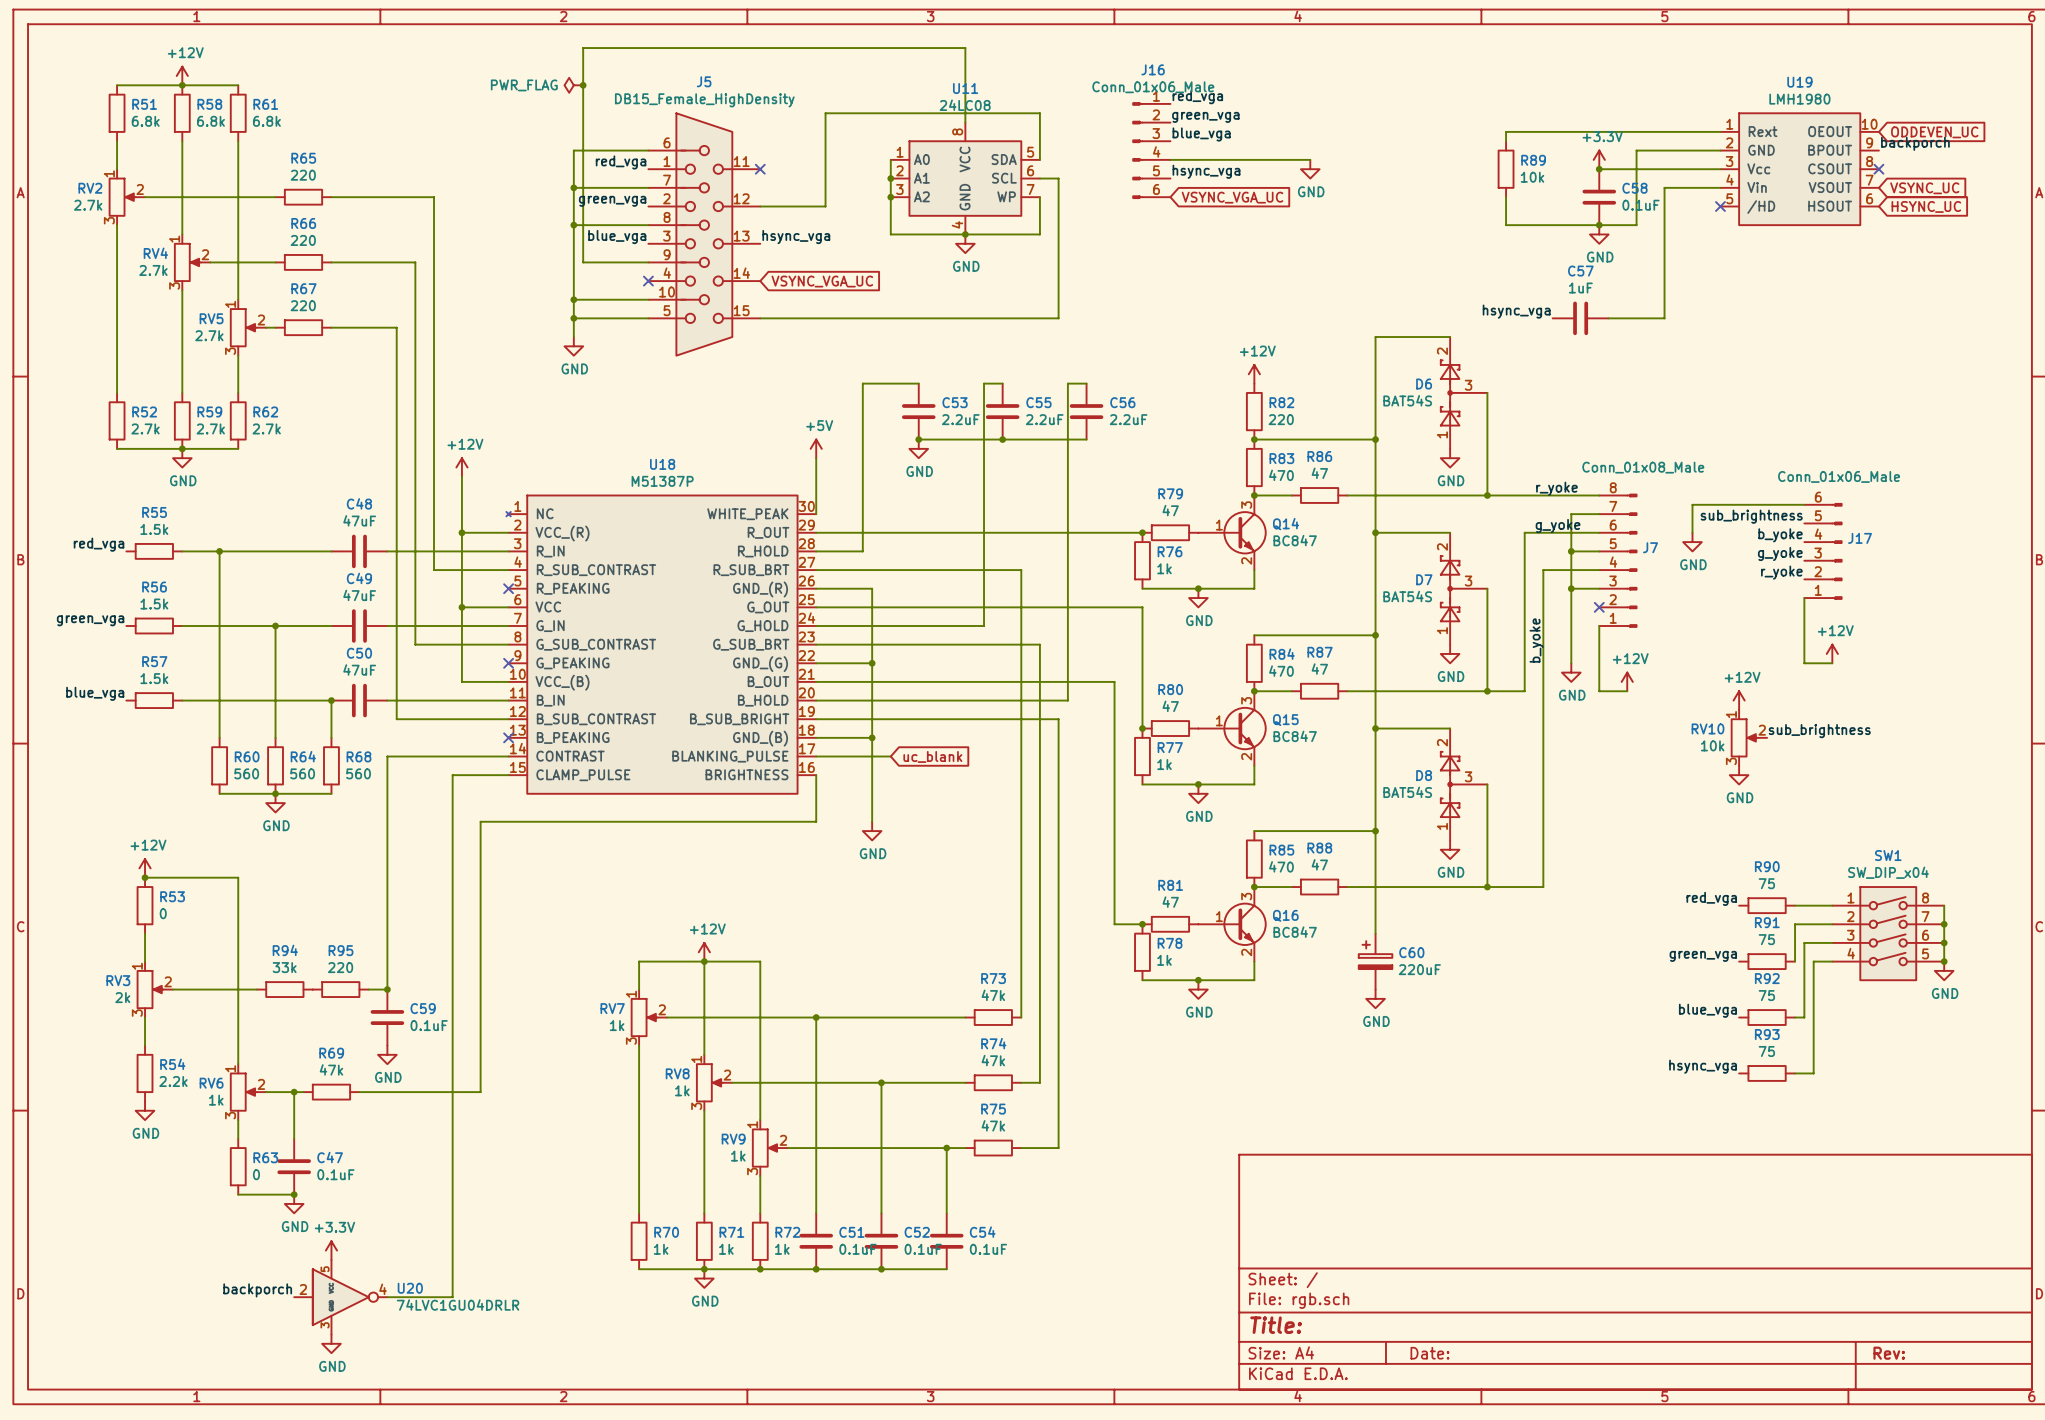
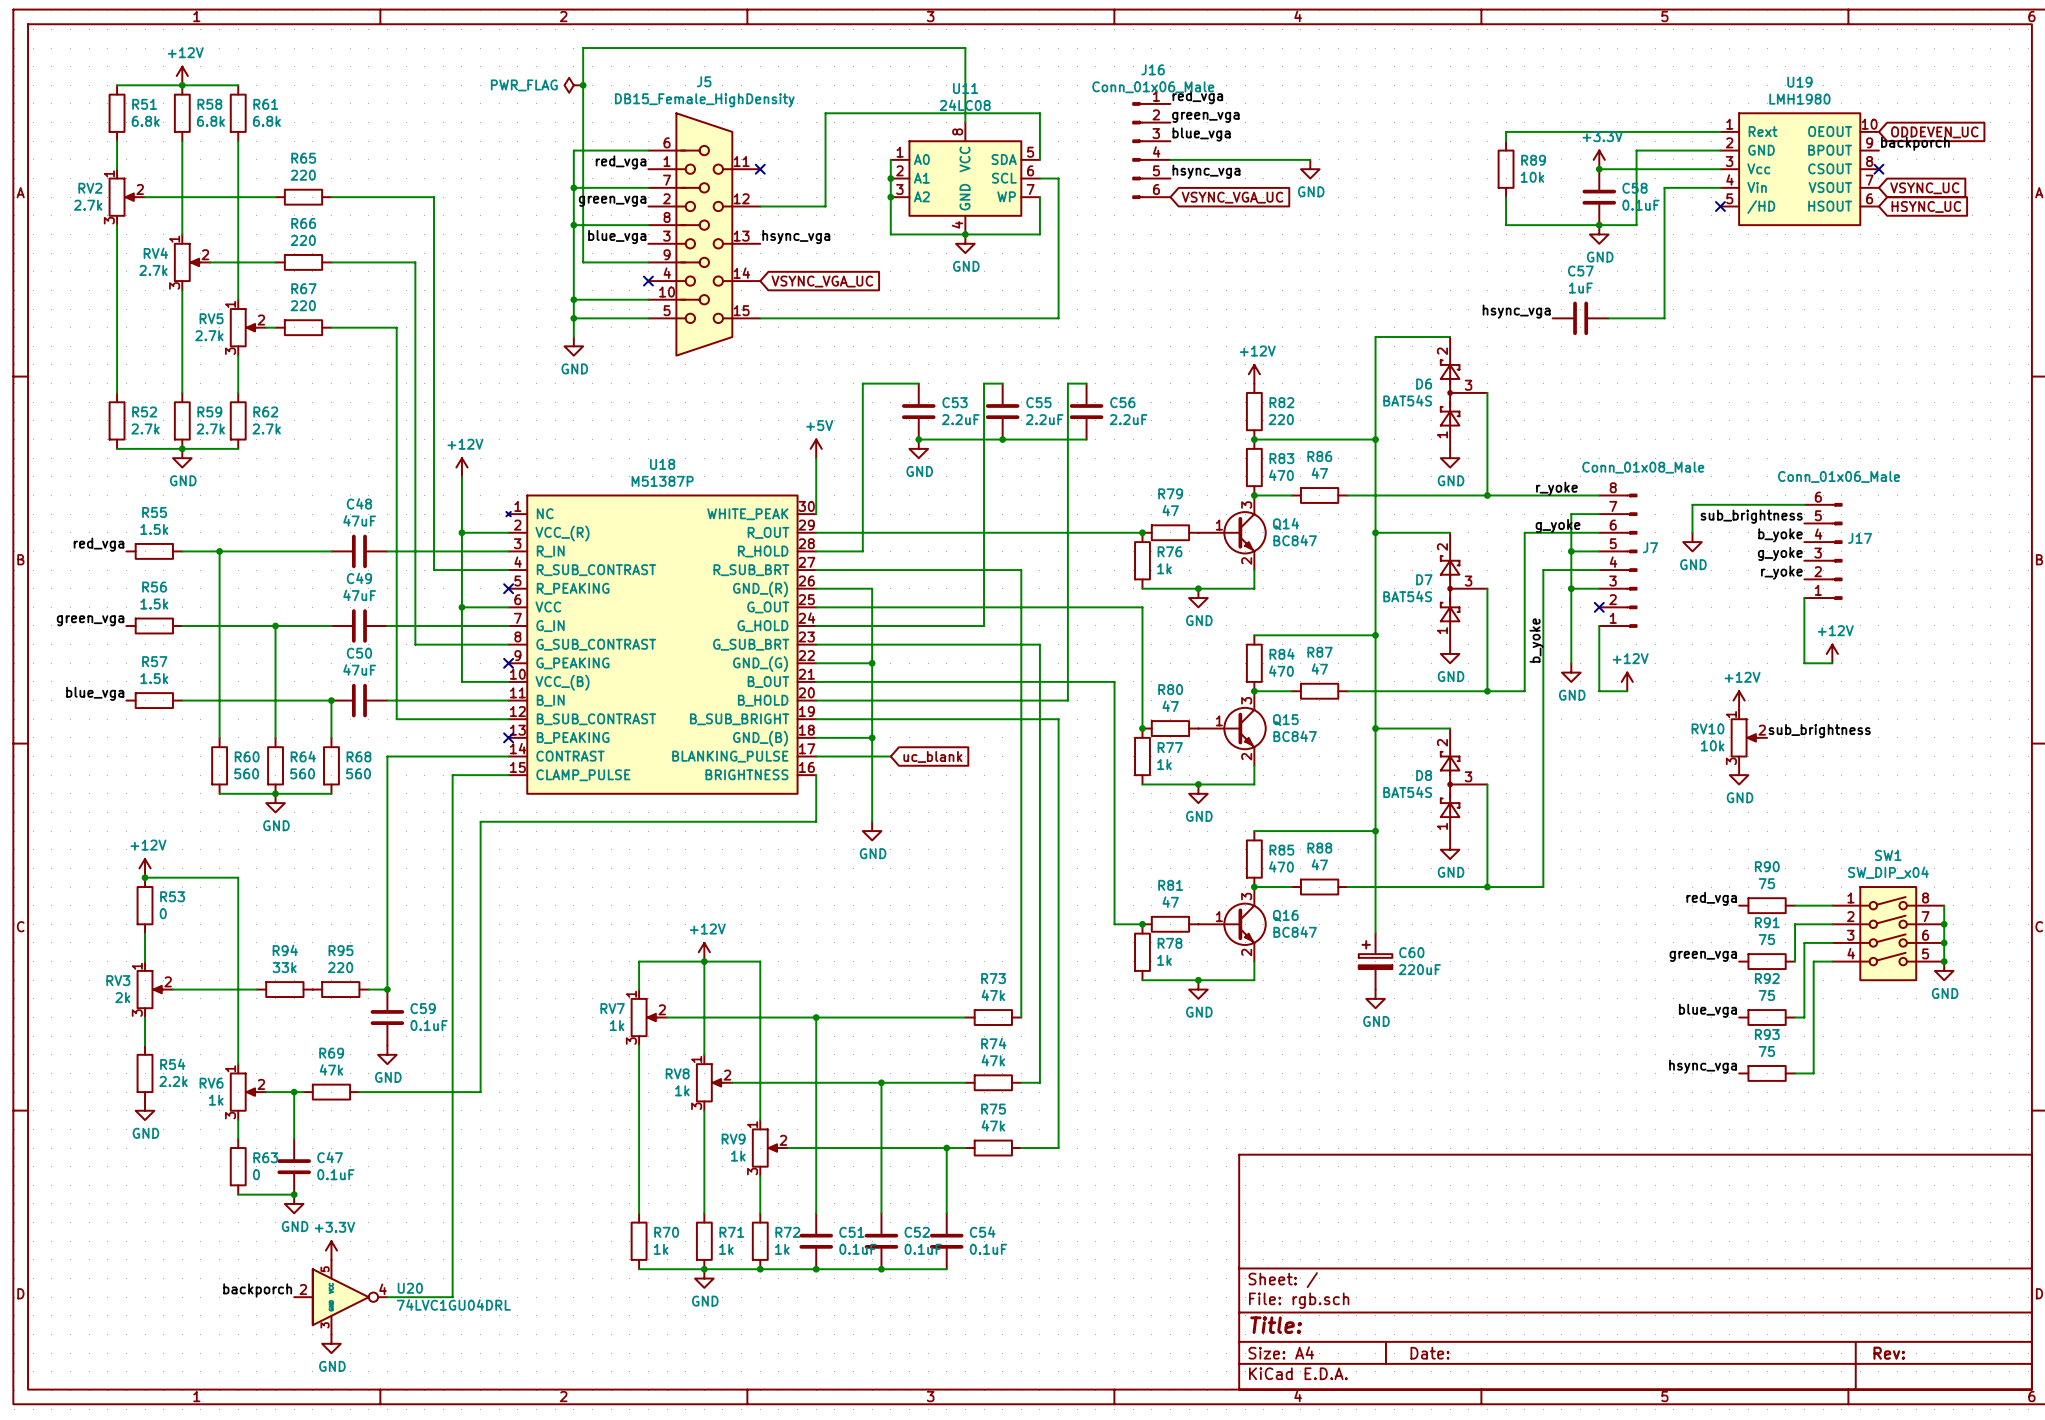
U20 value: 74LVC1GU04DRLR (458, 1305) -> 74LVC1GU04DRL (453, 1305)

